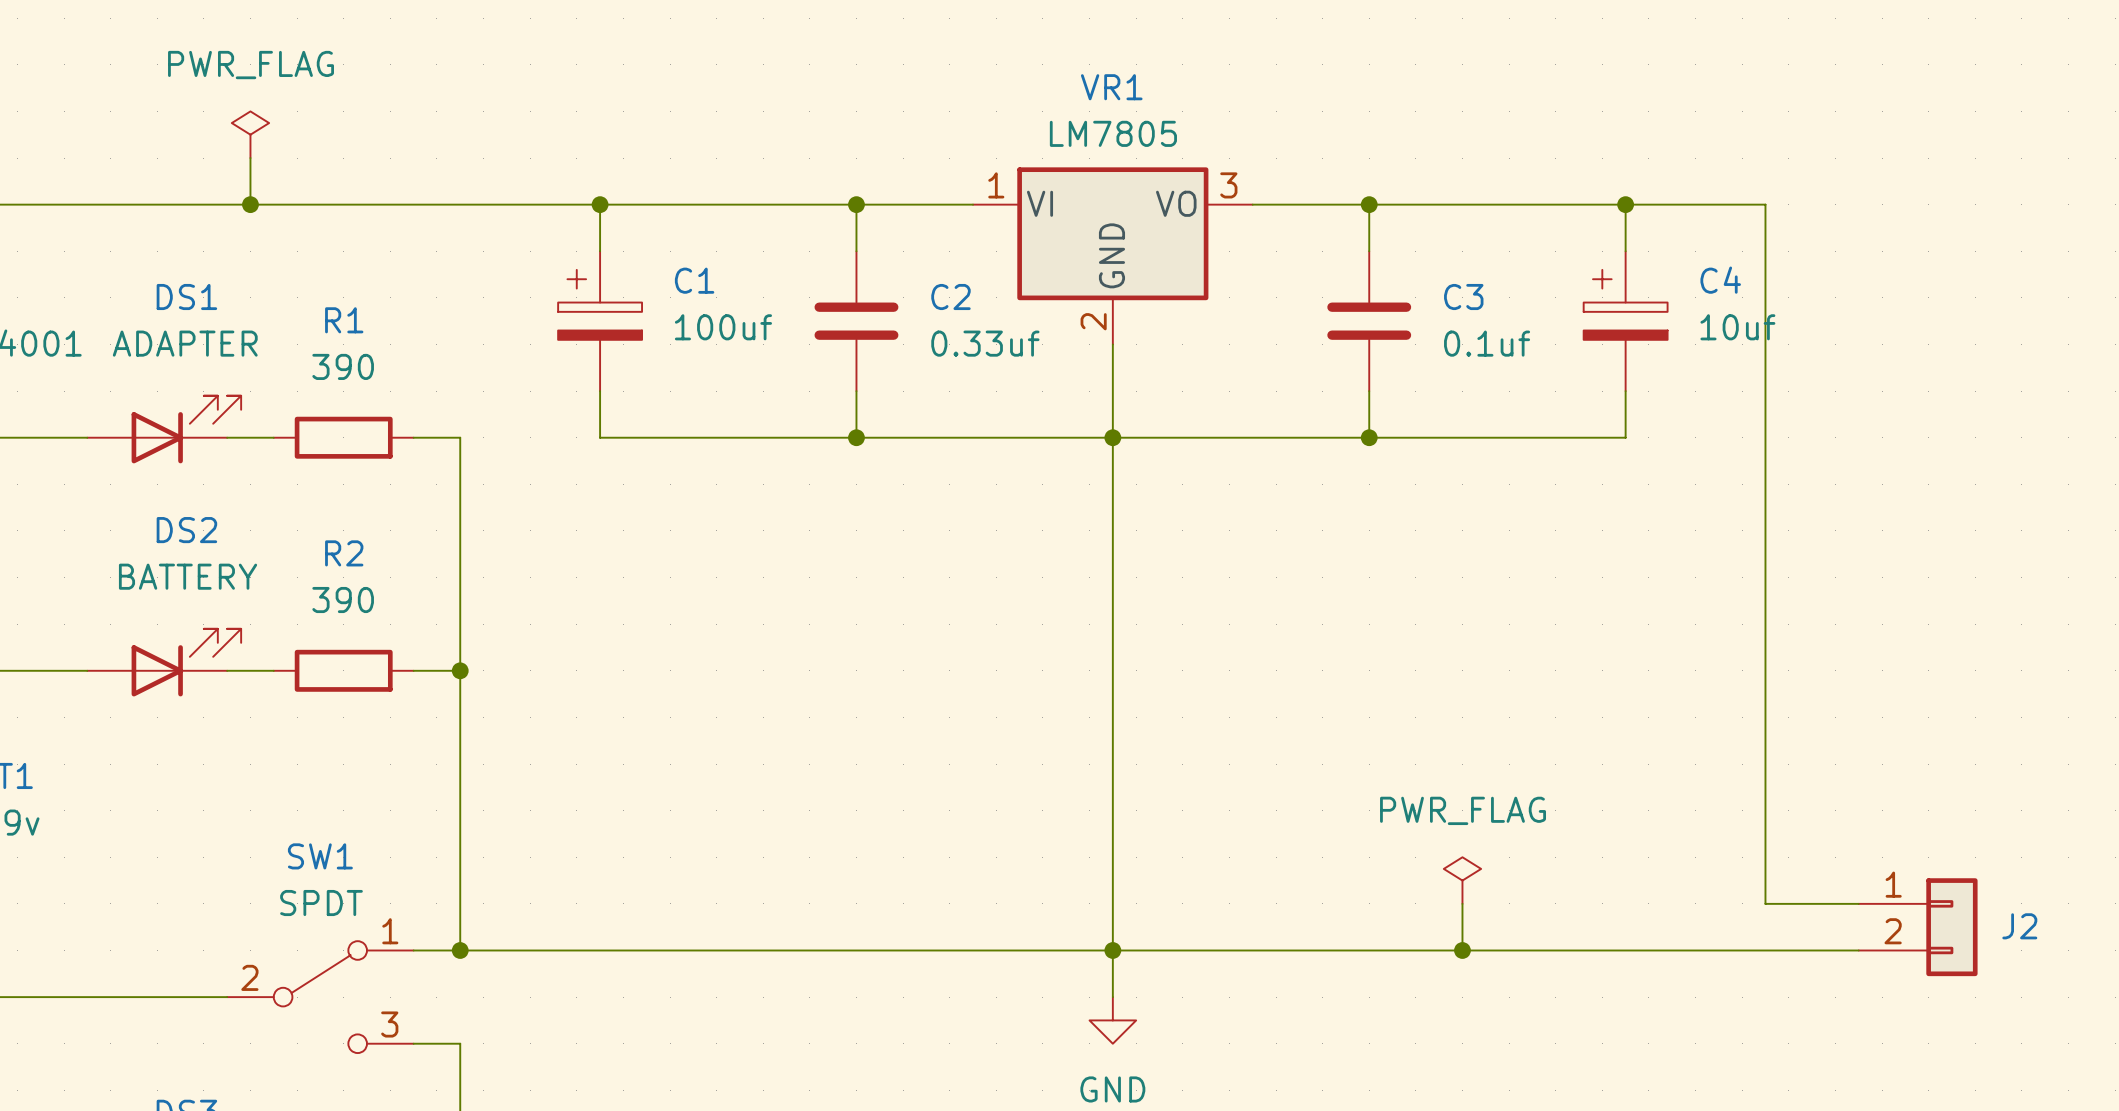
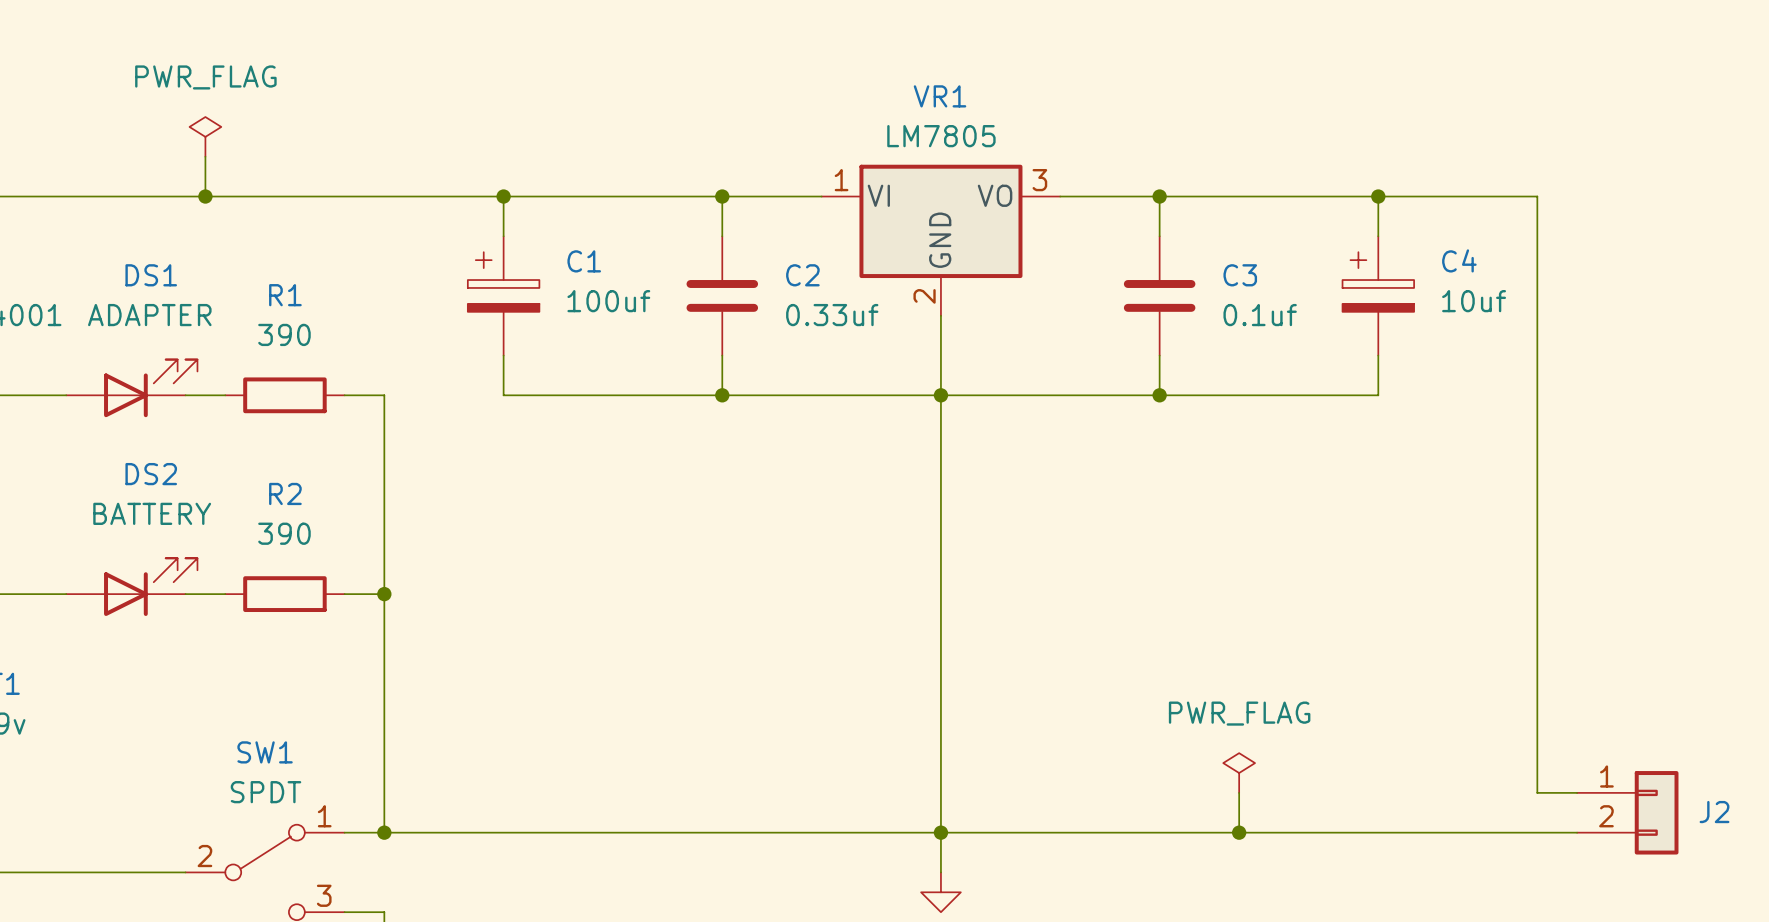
wire: (1765, 204) (1765, 903) (1812, 903) -> (1497, 196) (1537, 196) (1537, 792)

